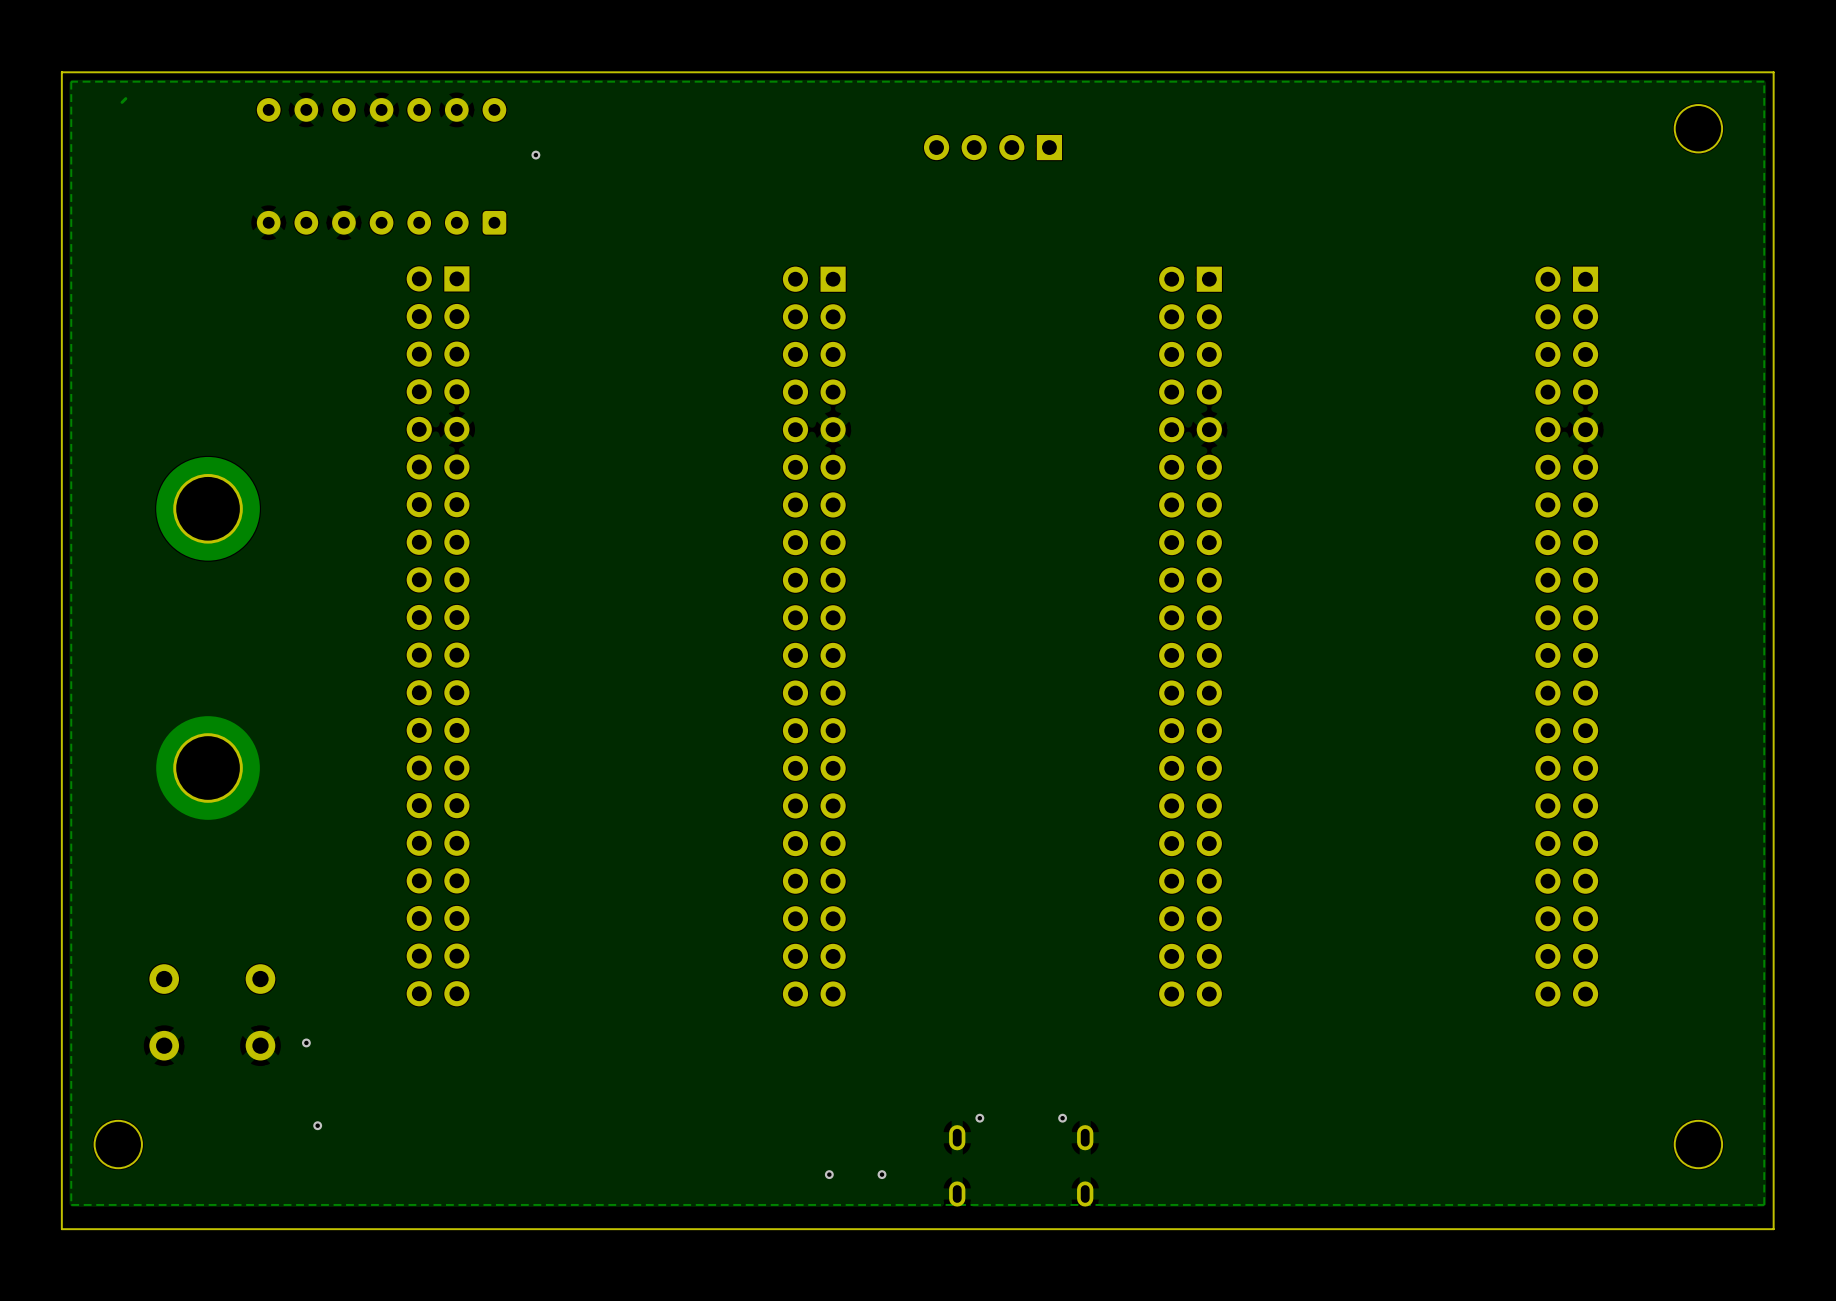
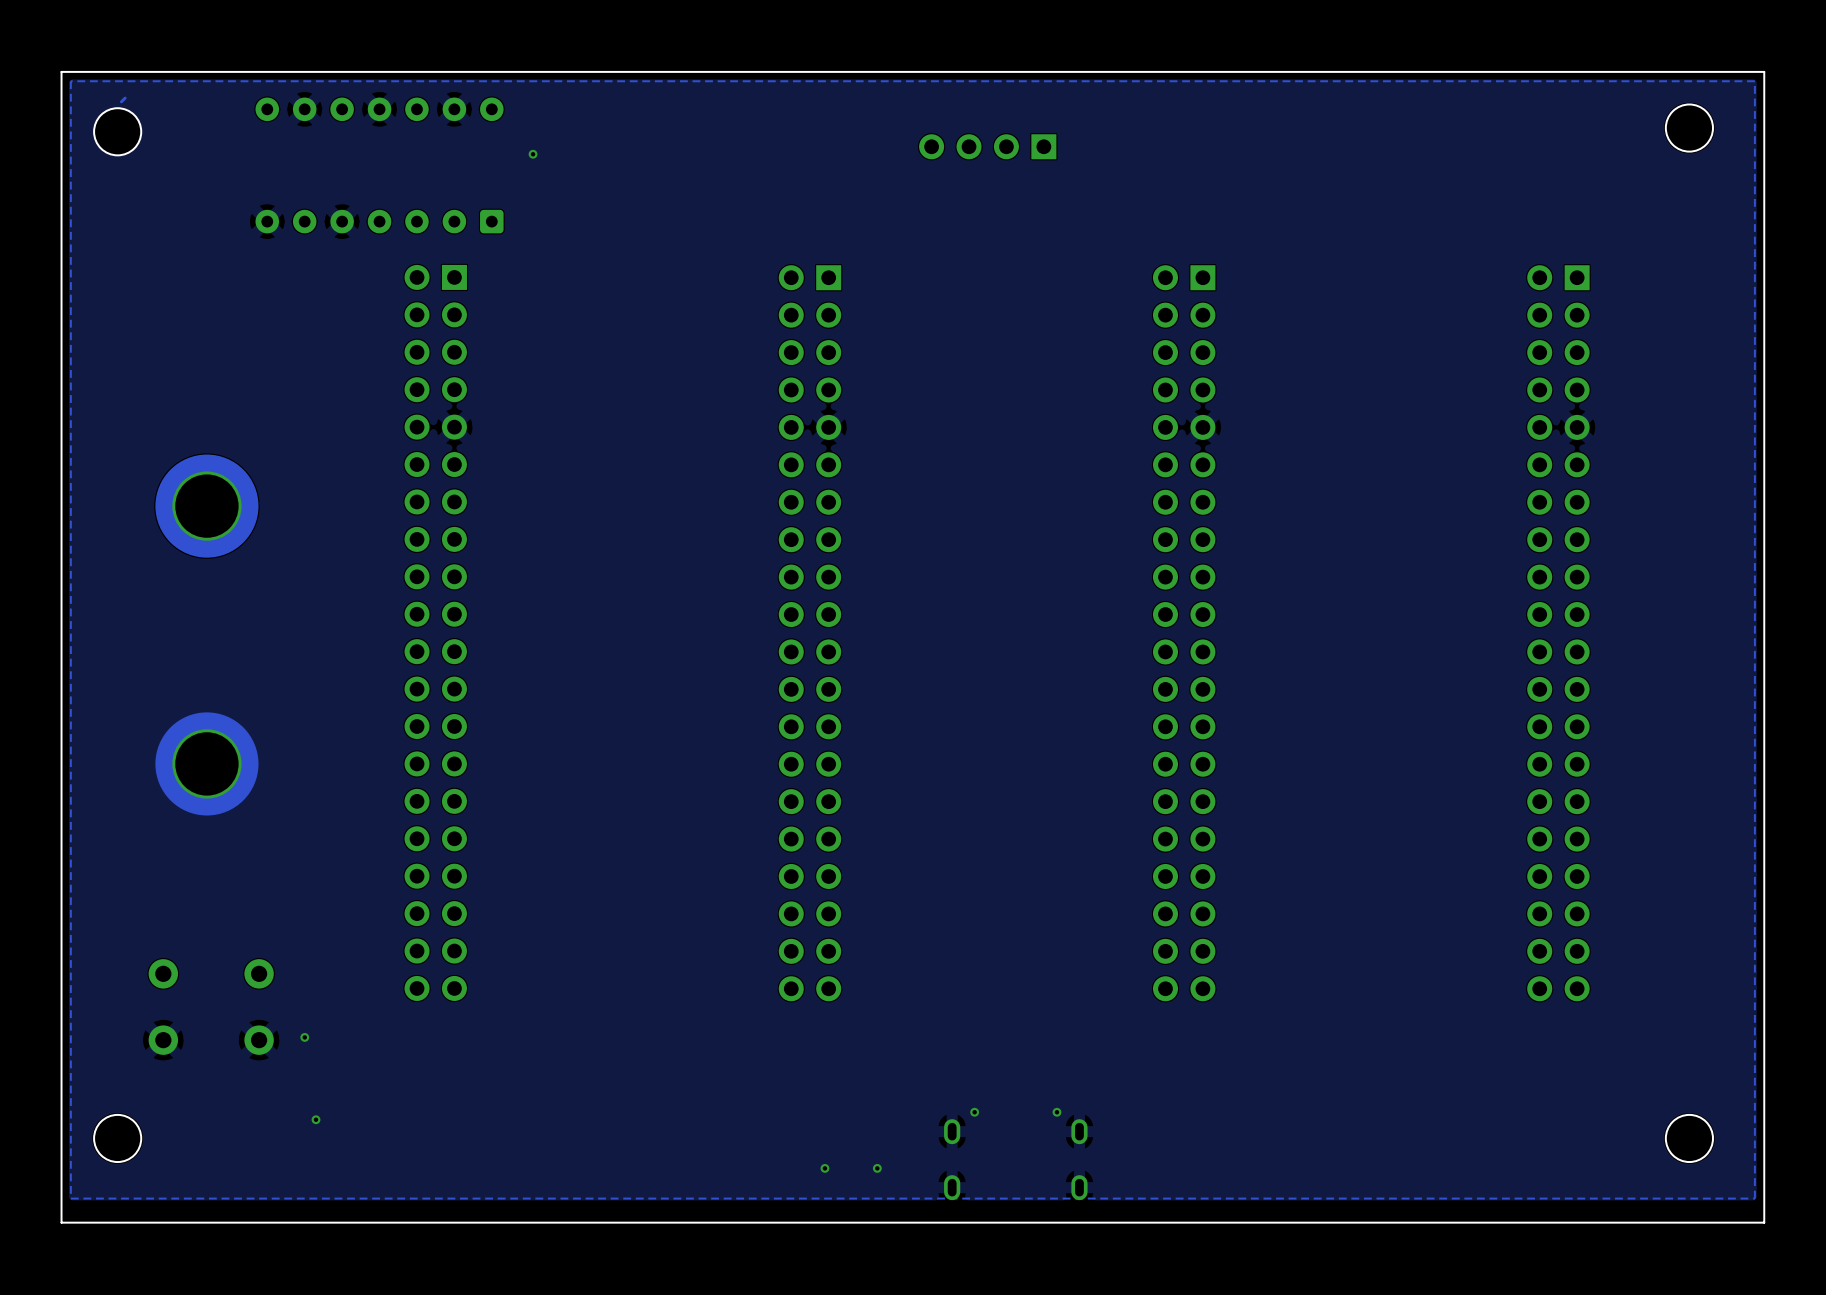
part: none -> (117, 131)

